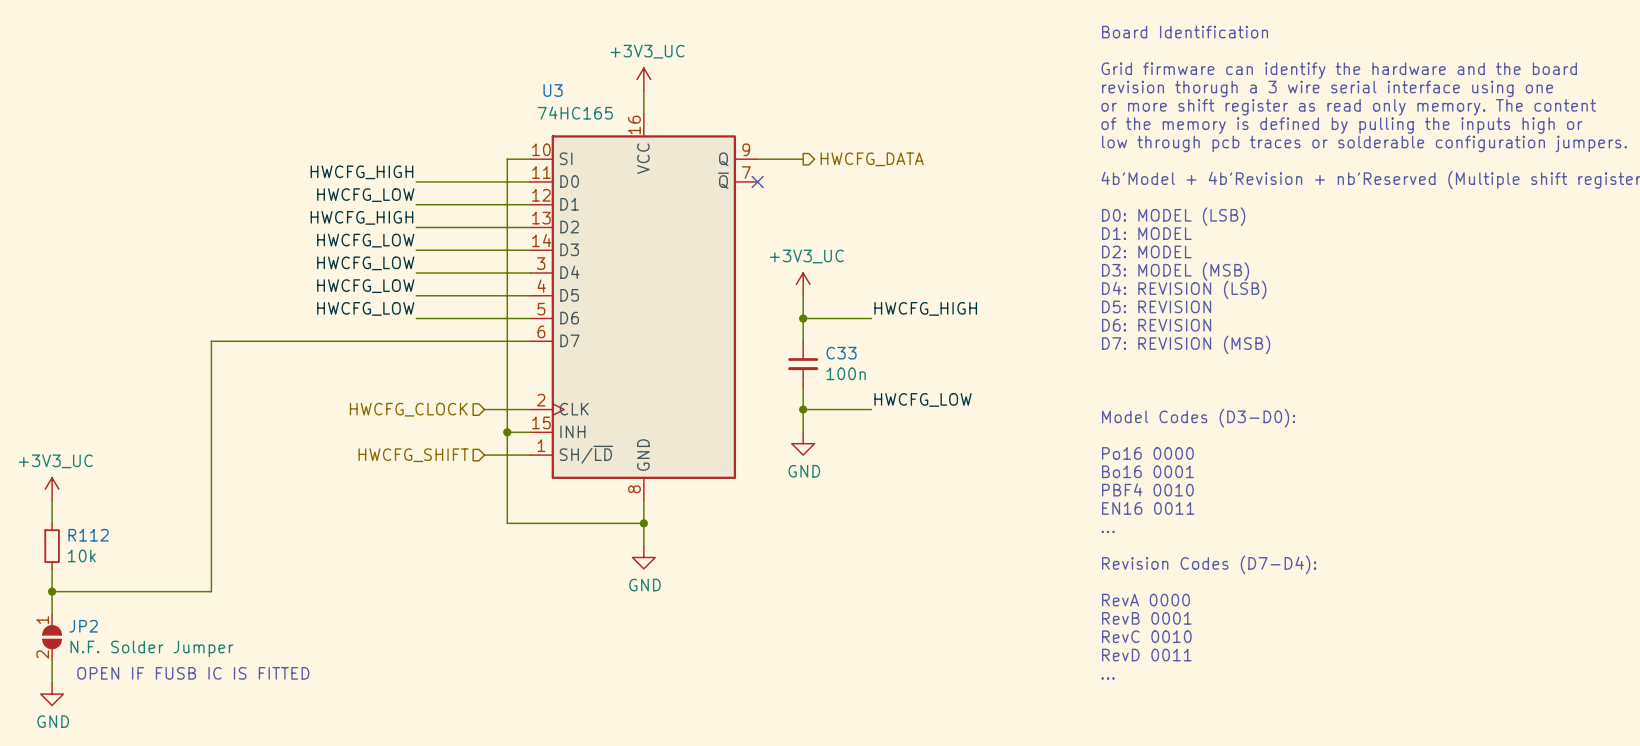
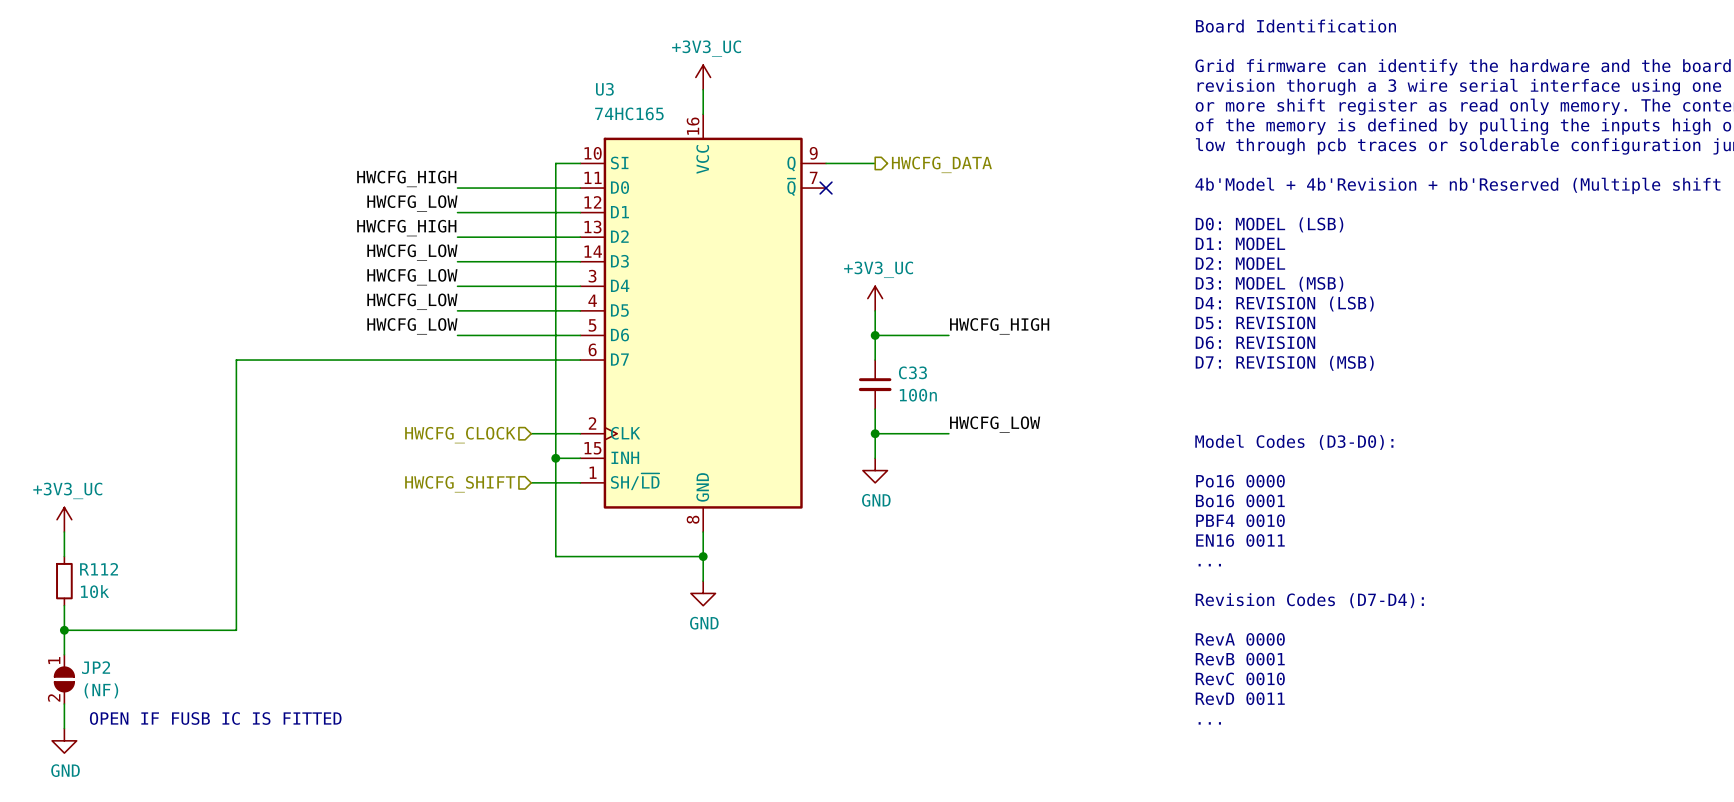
JP2 value: N.F. Solder Jumper (151, 648) -> (NF) (101, 690)

